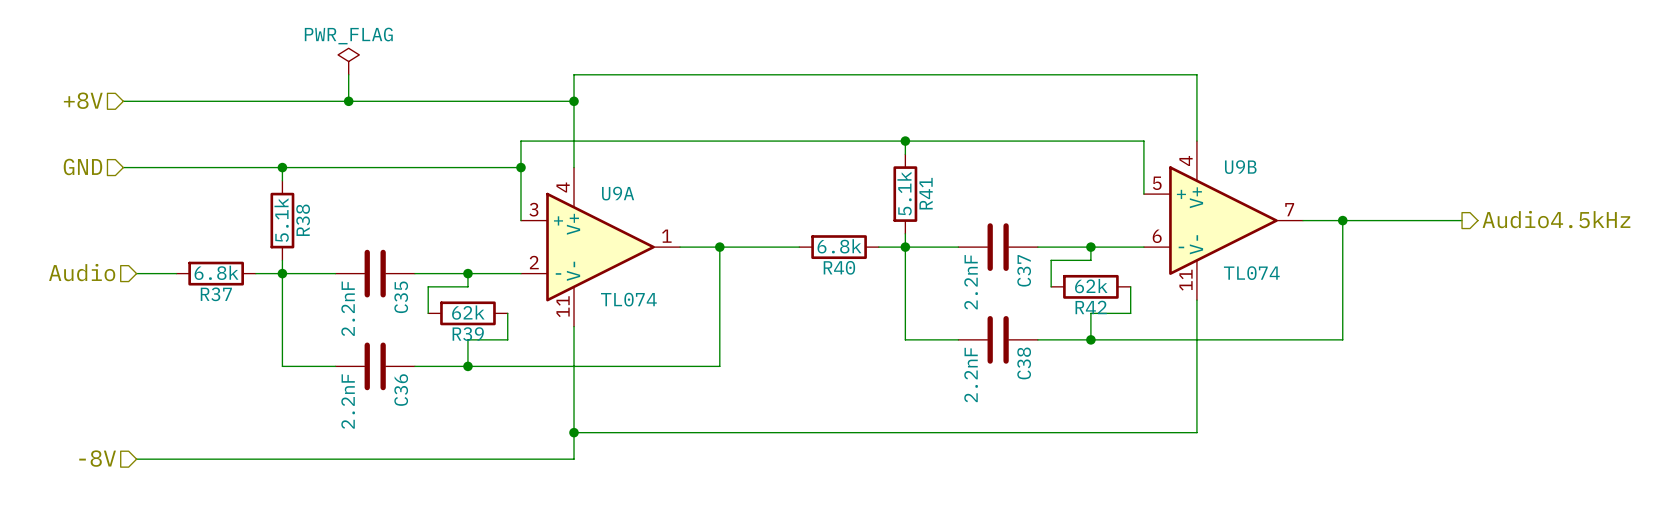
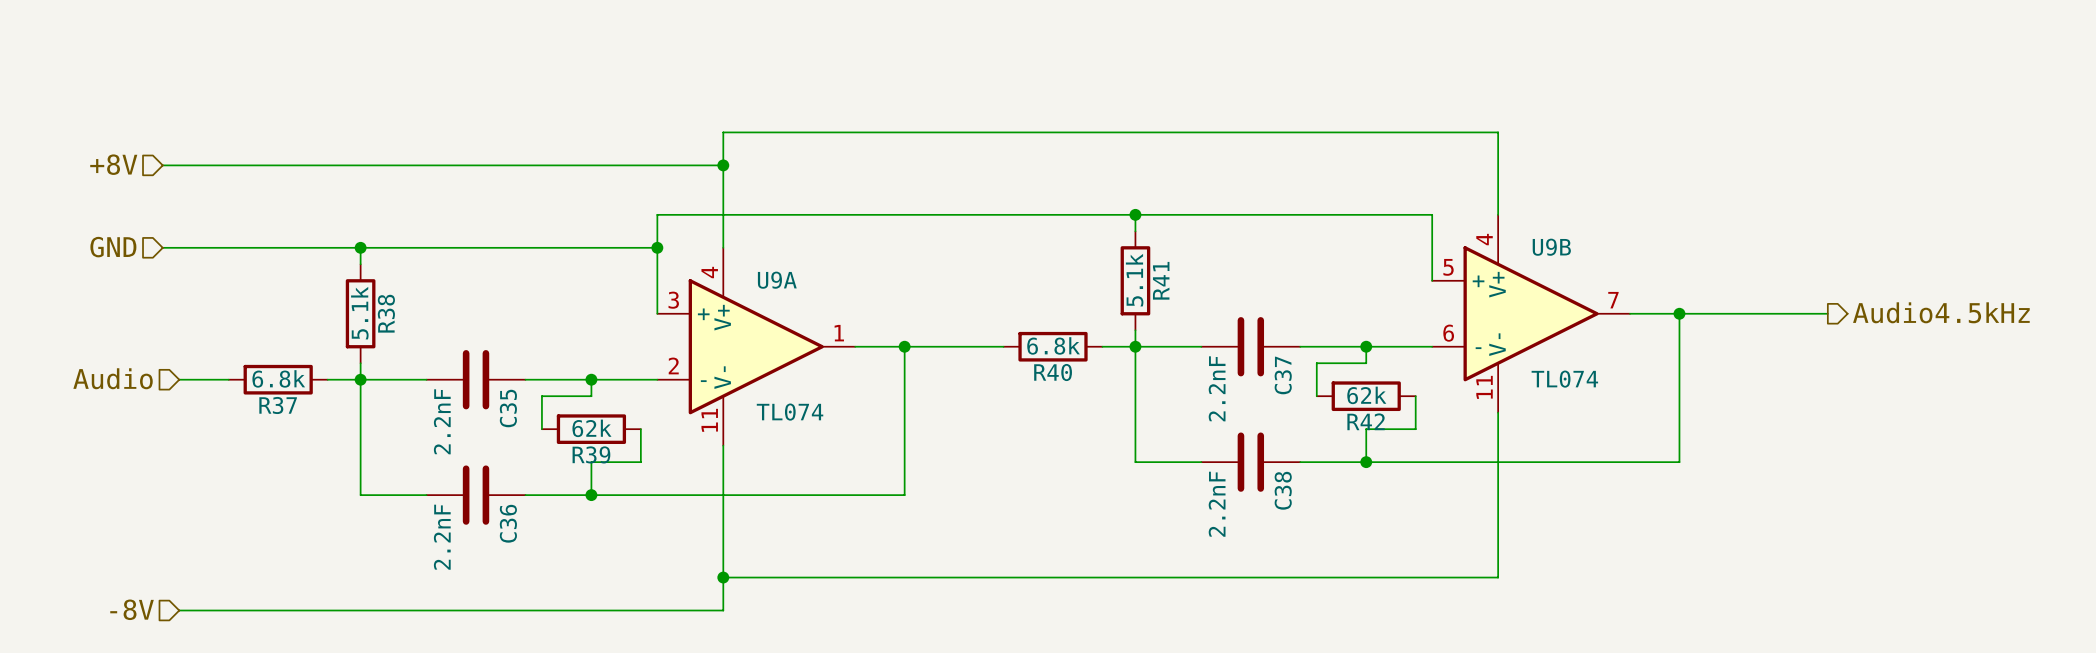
power symbol: PWR_FLAG (348, 61) -> none
wire: (348, 74) (348, 101) -> none
junction: (348, 101) -> none

